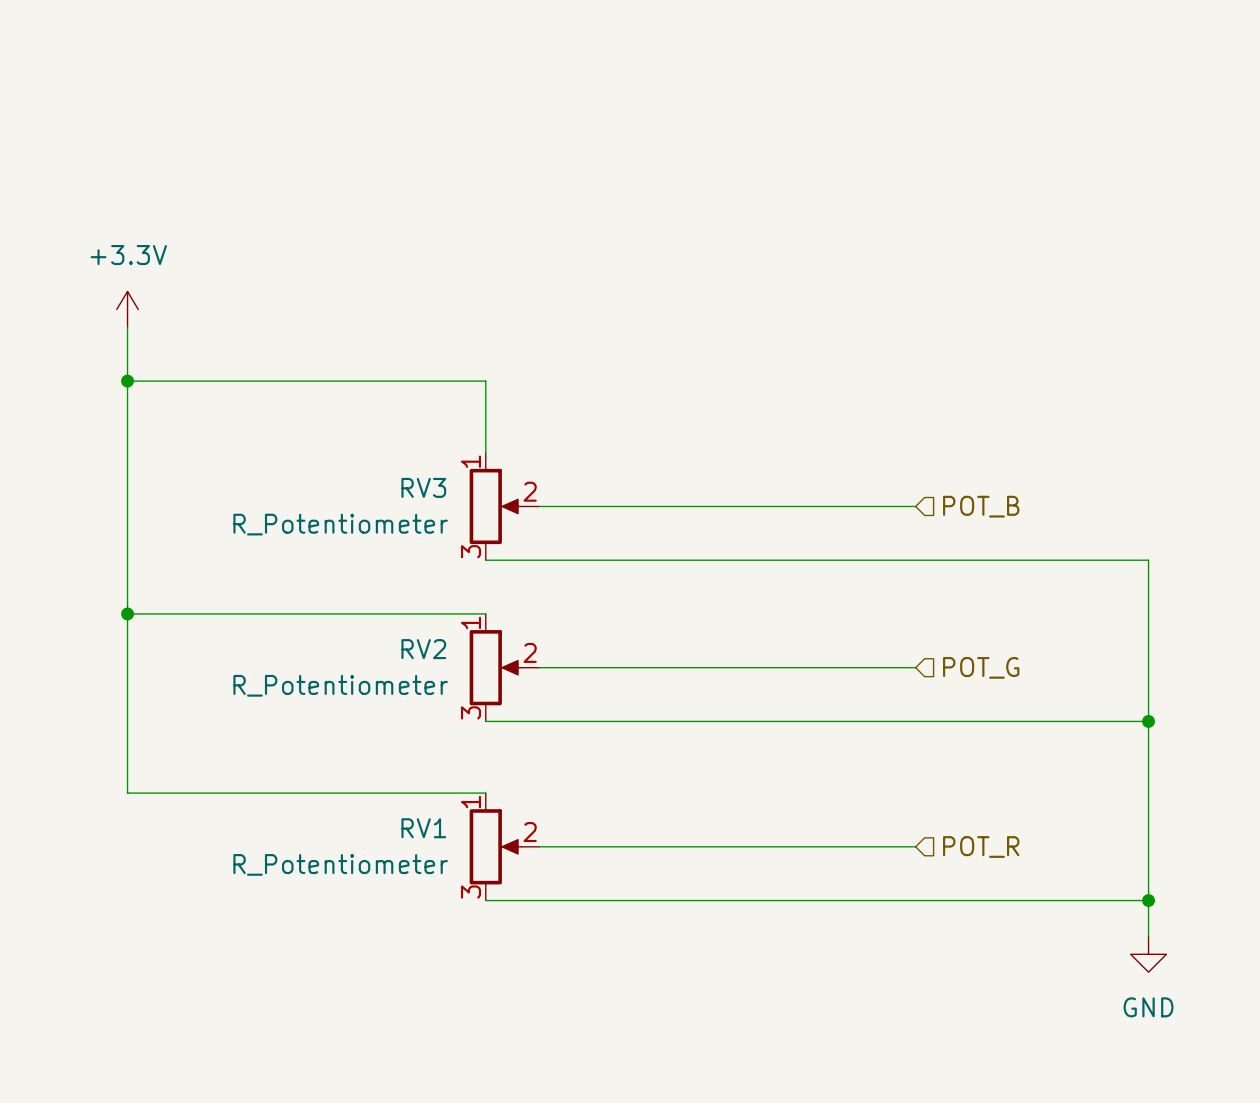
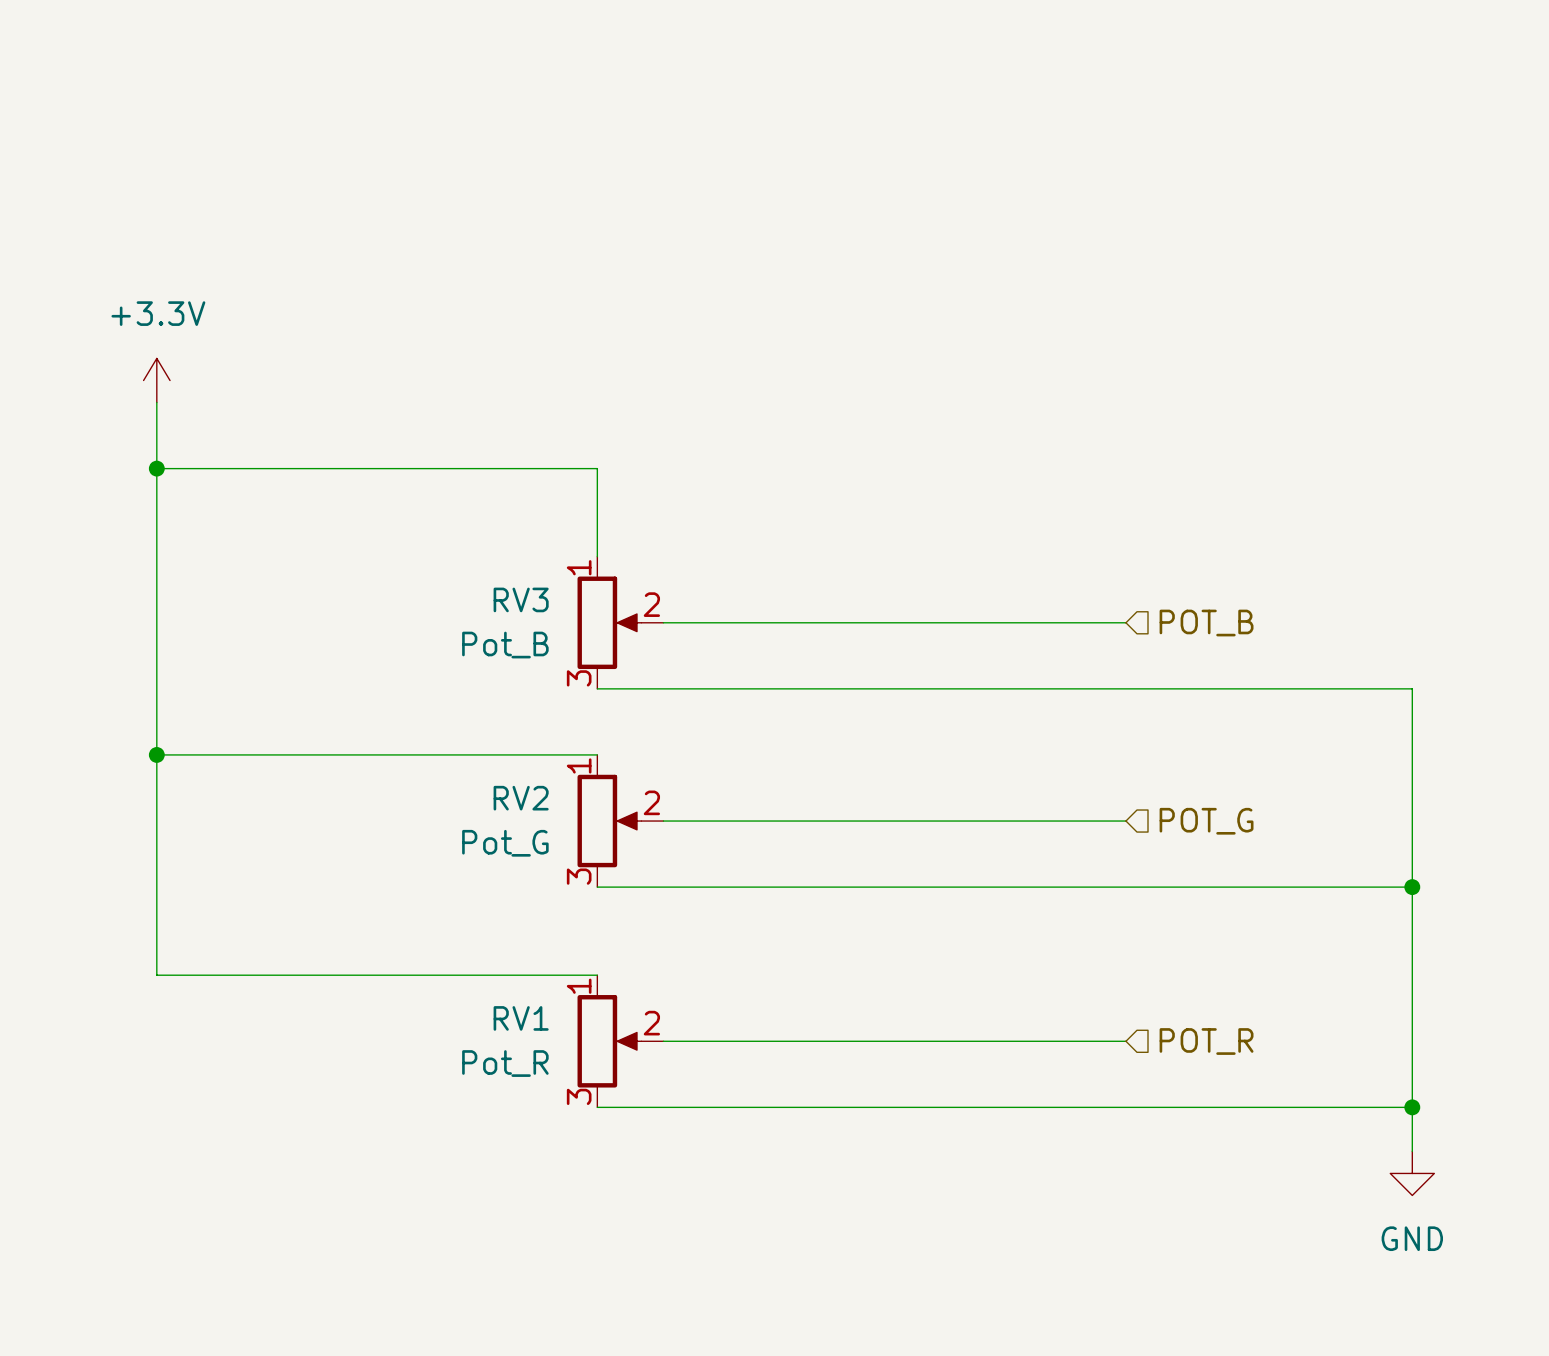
RV3 value: R_Potentiometer (340, 524) -> Pot_B (505, 645)
RV2 value: R_Potentiometer (340, 685) -> Pot_G (505, 843)
RV1 value: R_Potentiometer (340, 864) -> Pot_R (505, 1063)

